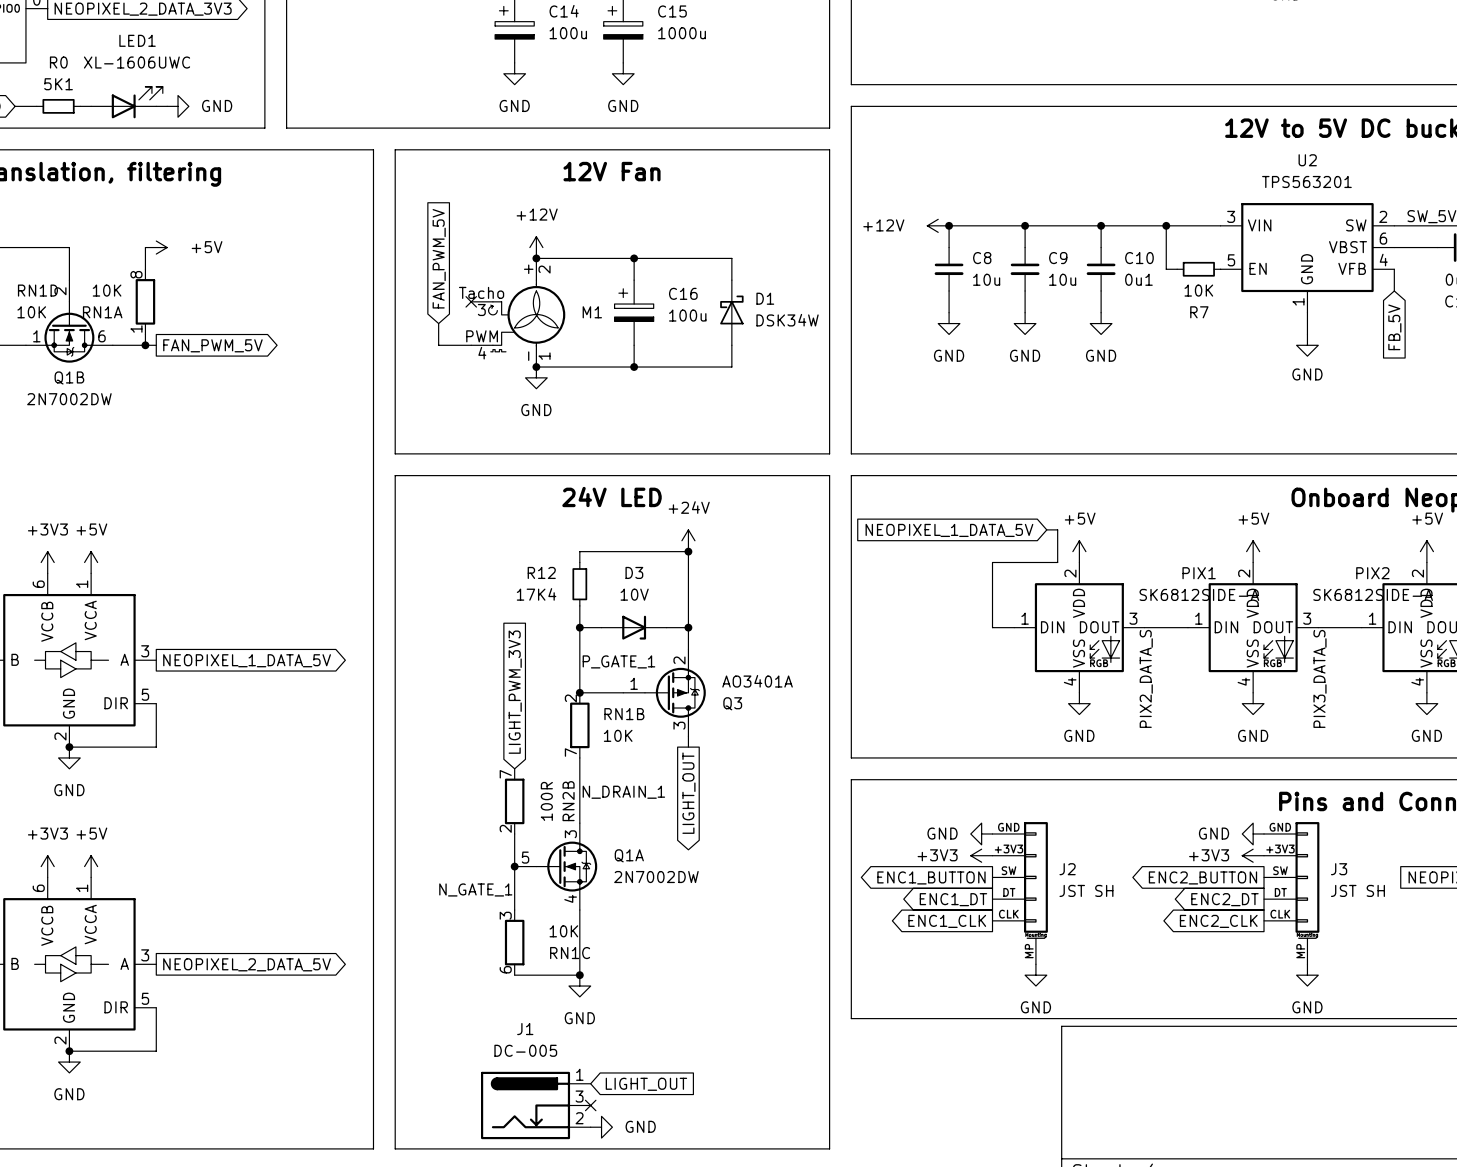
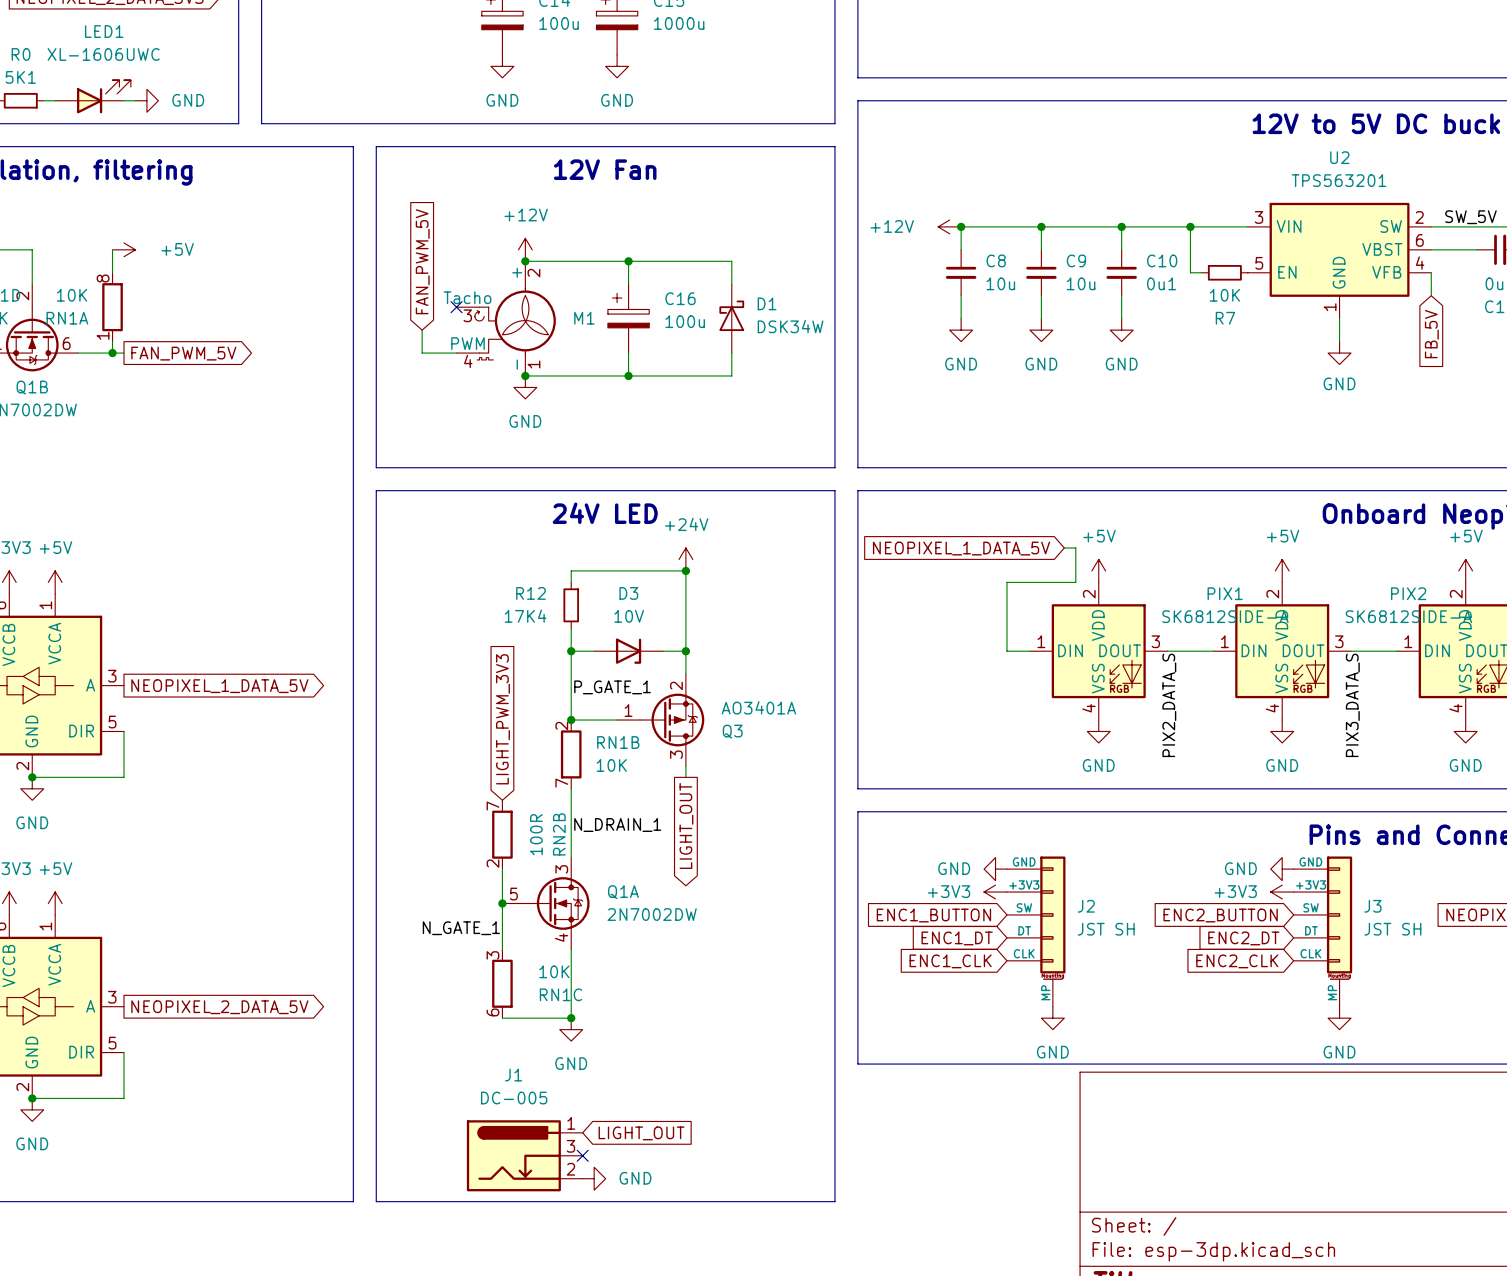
global label shape: output (931, 877) -> input (933, 915)
global label shape: output (1202, 877) -> input (1220, 915)
global label shape: output (953, 899) -> input (957, 938)
global label shape: output (1224, 899) -> input (1243, 938)
global label shape: output (947, 921) -> input (950, 961)
global label shape: output (1218, 921) -> input (1237, 961)

